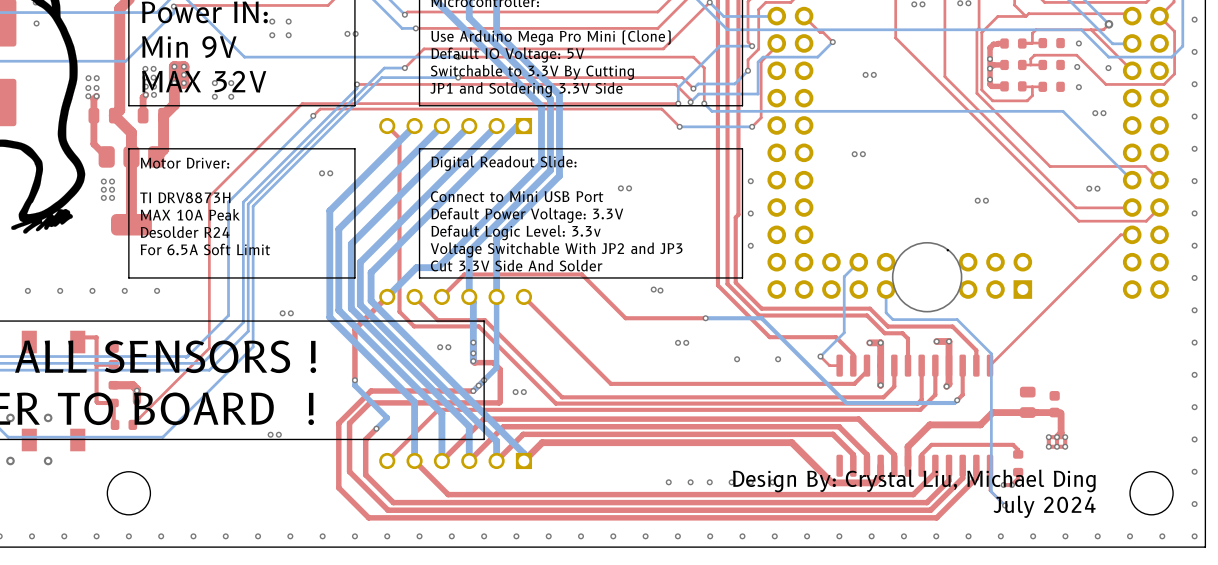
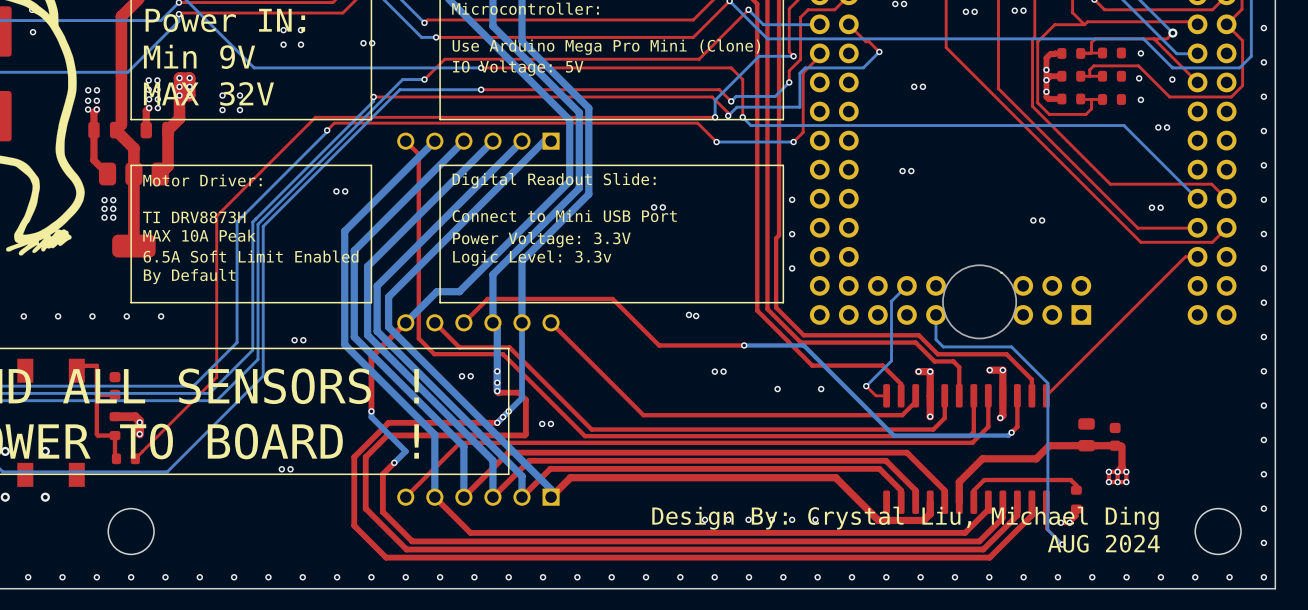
text: Default IO Voltage: 5V (507, 55) -> IO Voltage: 5V (518, 68)
text: Switchable to 3.3V By Cutting (532, 72) -> none
text: JP1 and Soldering 3.3V Side (526, 89) -> none
text: Default Power Voltage: 3.3V (527, 215) -> Power Voltage: 3.3V (541, 239)
text: Desolder R24 (185, 232) -> none
text: Default Logic Level: 3.3v (516, 232) -> Logic Level: 3.3v (532, 258)
text: For 6.5A Soft Limit (205, 249) -> 6.5A Soft Limit Enabled (251, 256)
text: Voltage Switchable With JP2 and JP3 (556, 250) -> none
text: none -> By Default (189, 276)
text: Cut 3.3V Side And Solder (516, 265) -> none
text: July 2024 (1044, 506) -> AUG 2024 (1103, 543)

